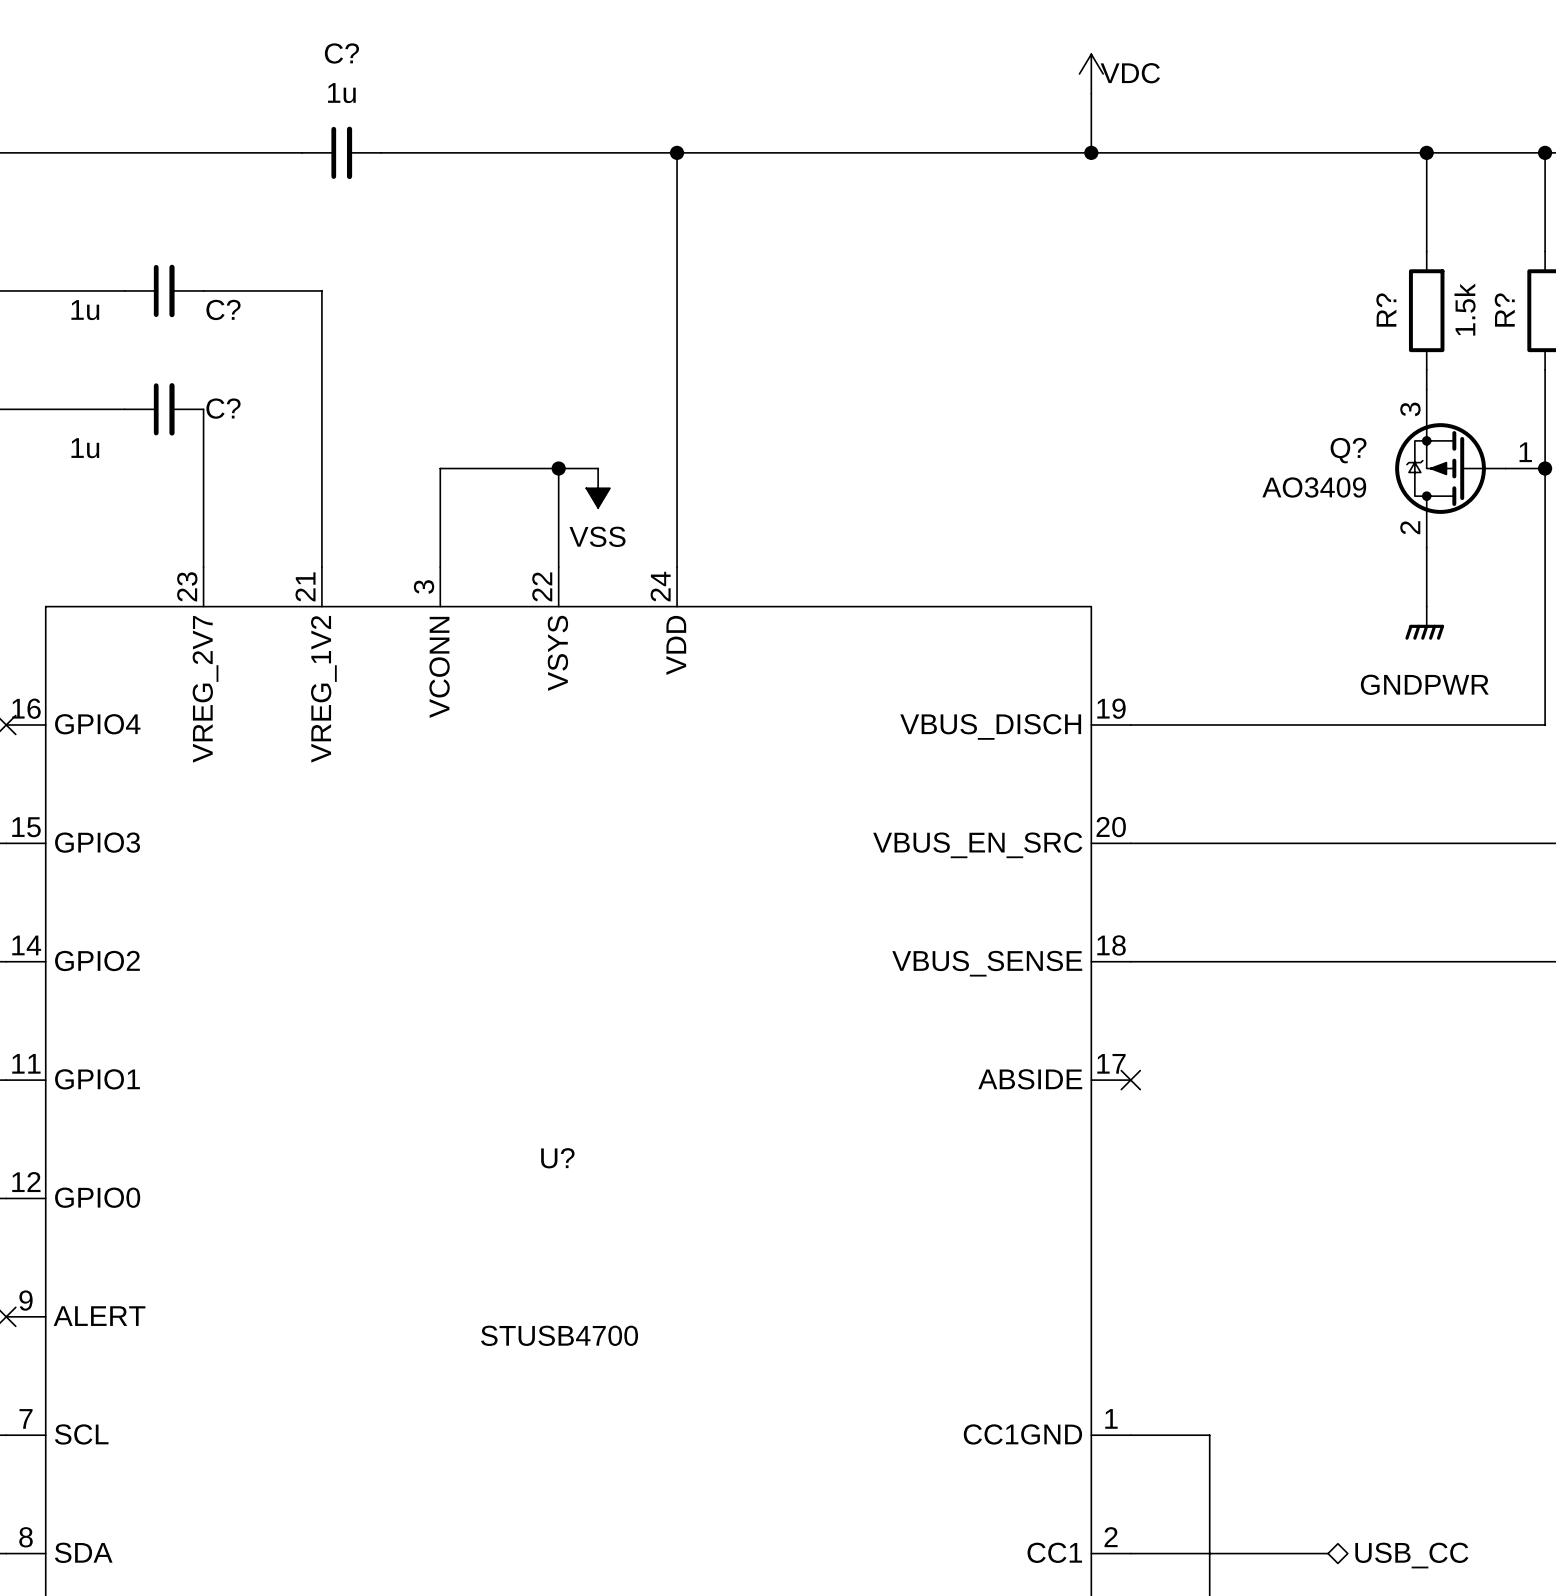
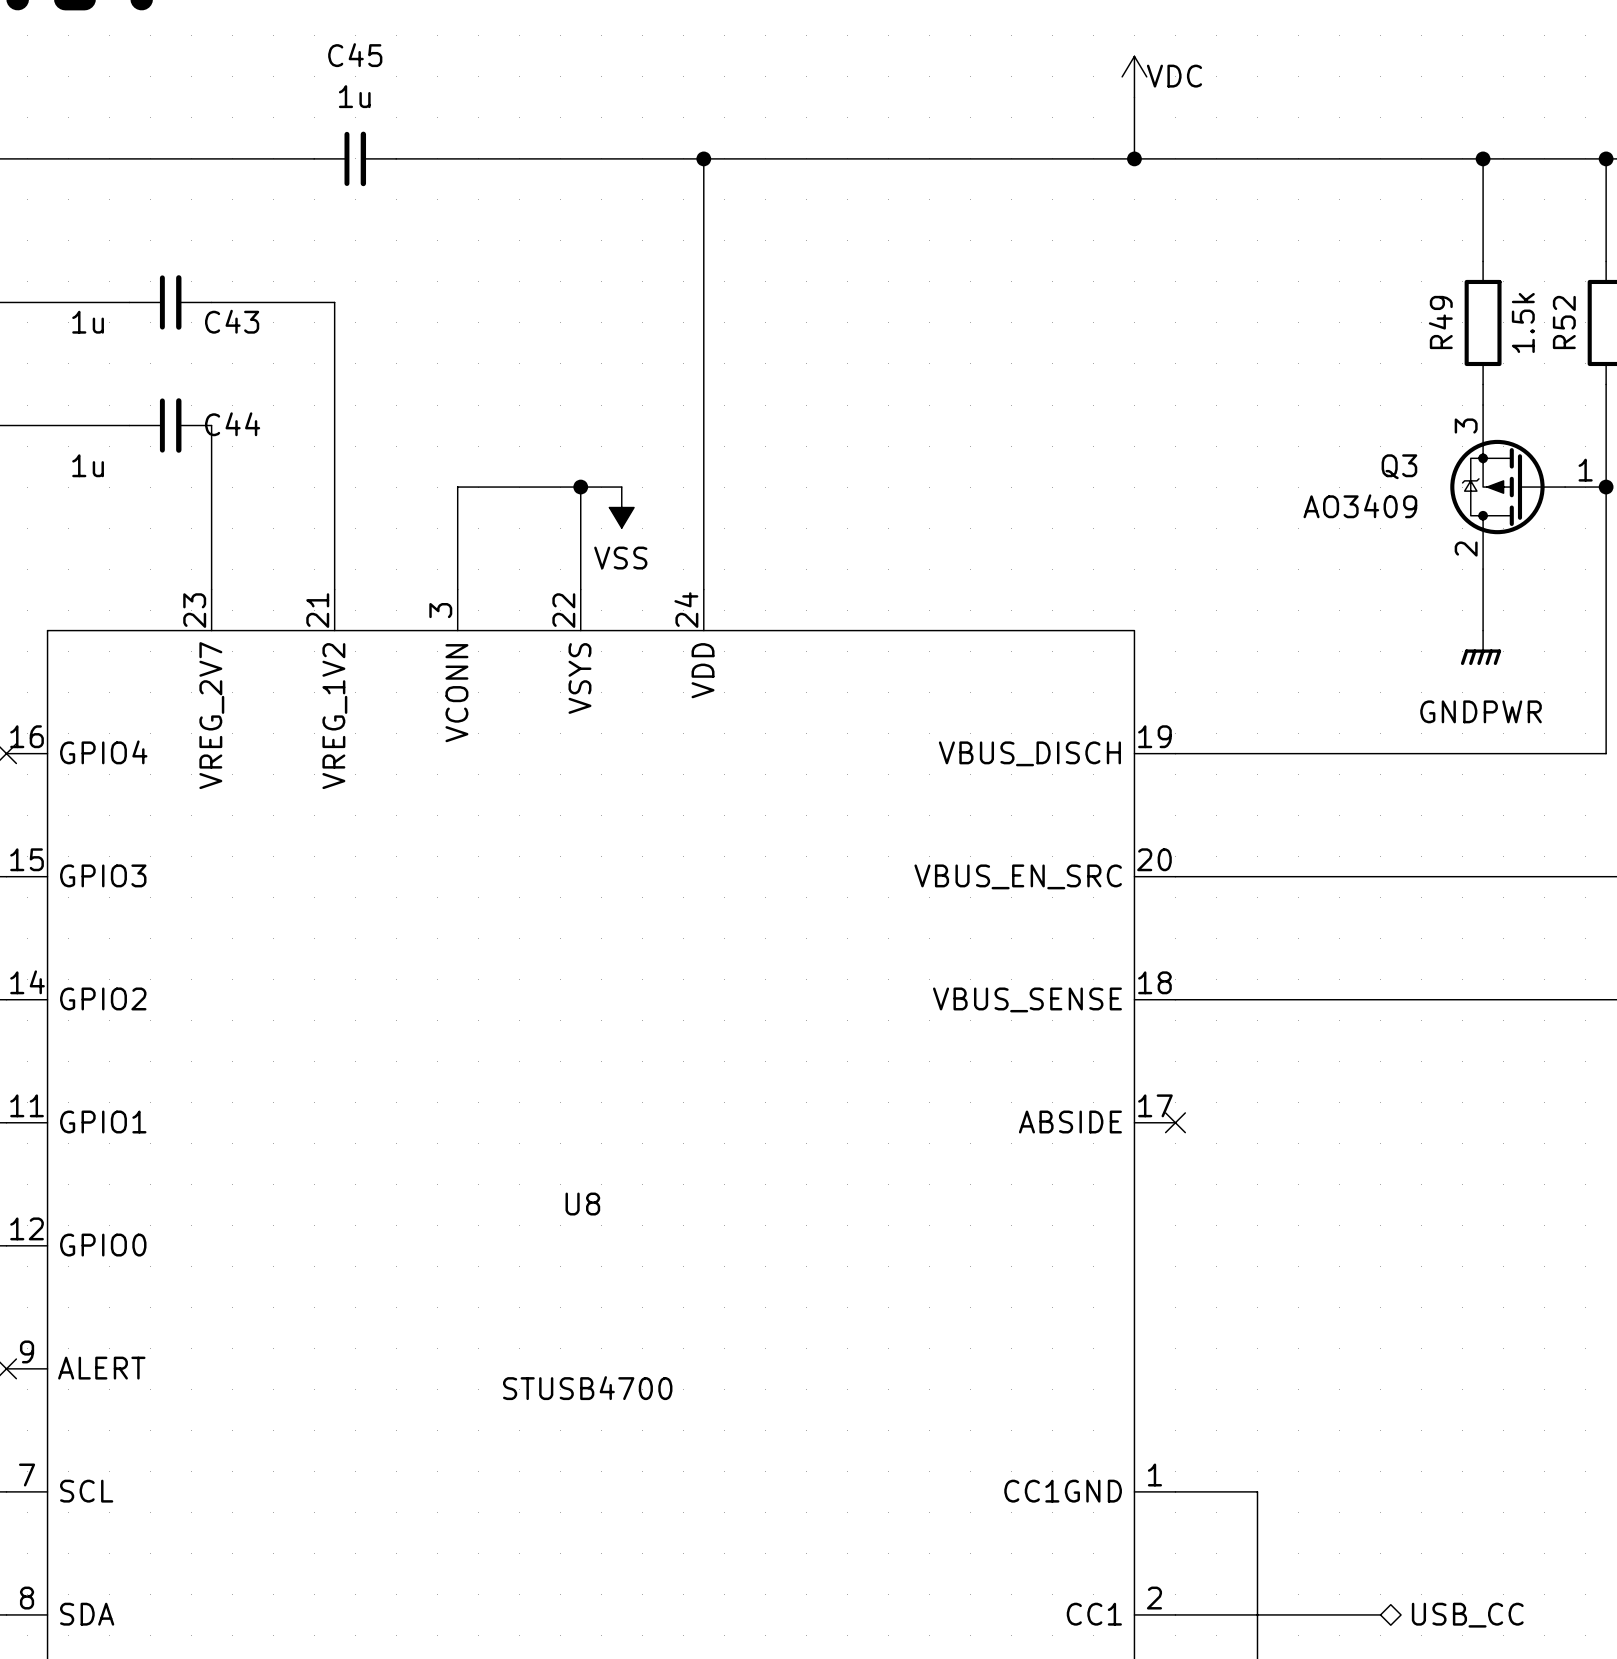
C? name: C? (341, 53) -> C45 (355, 55)
C? name: C? (223, 309) -> C43 (232, 321)
R? name: R? (1386, 310) -> R49 (1440, 322)
R? name: R? (1504, 310) -> R52 (1564, 322)
C? name: C? (223, 408) -> C44 (232, 424)
Q? name: Q? (1348, 450) -> Q3 (1399, 466)
U? name: U? (557, 1158) -> U8 (582, 1204)

